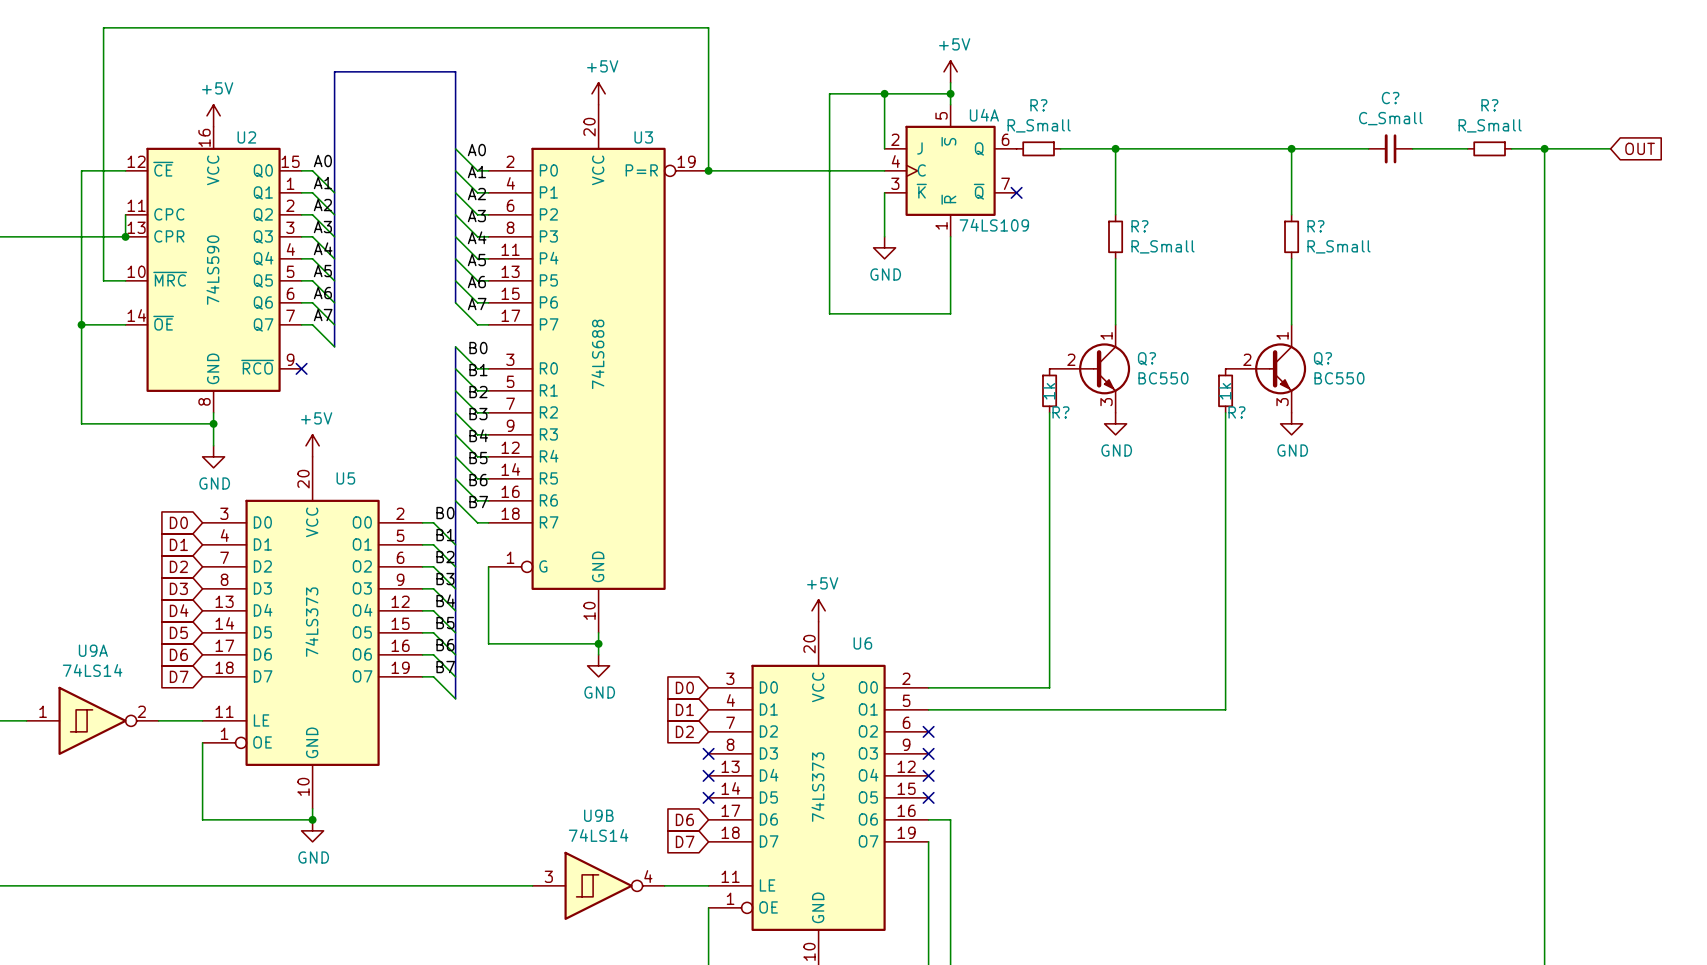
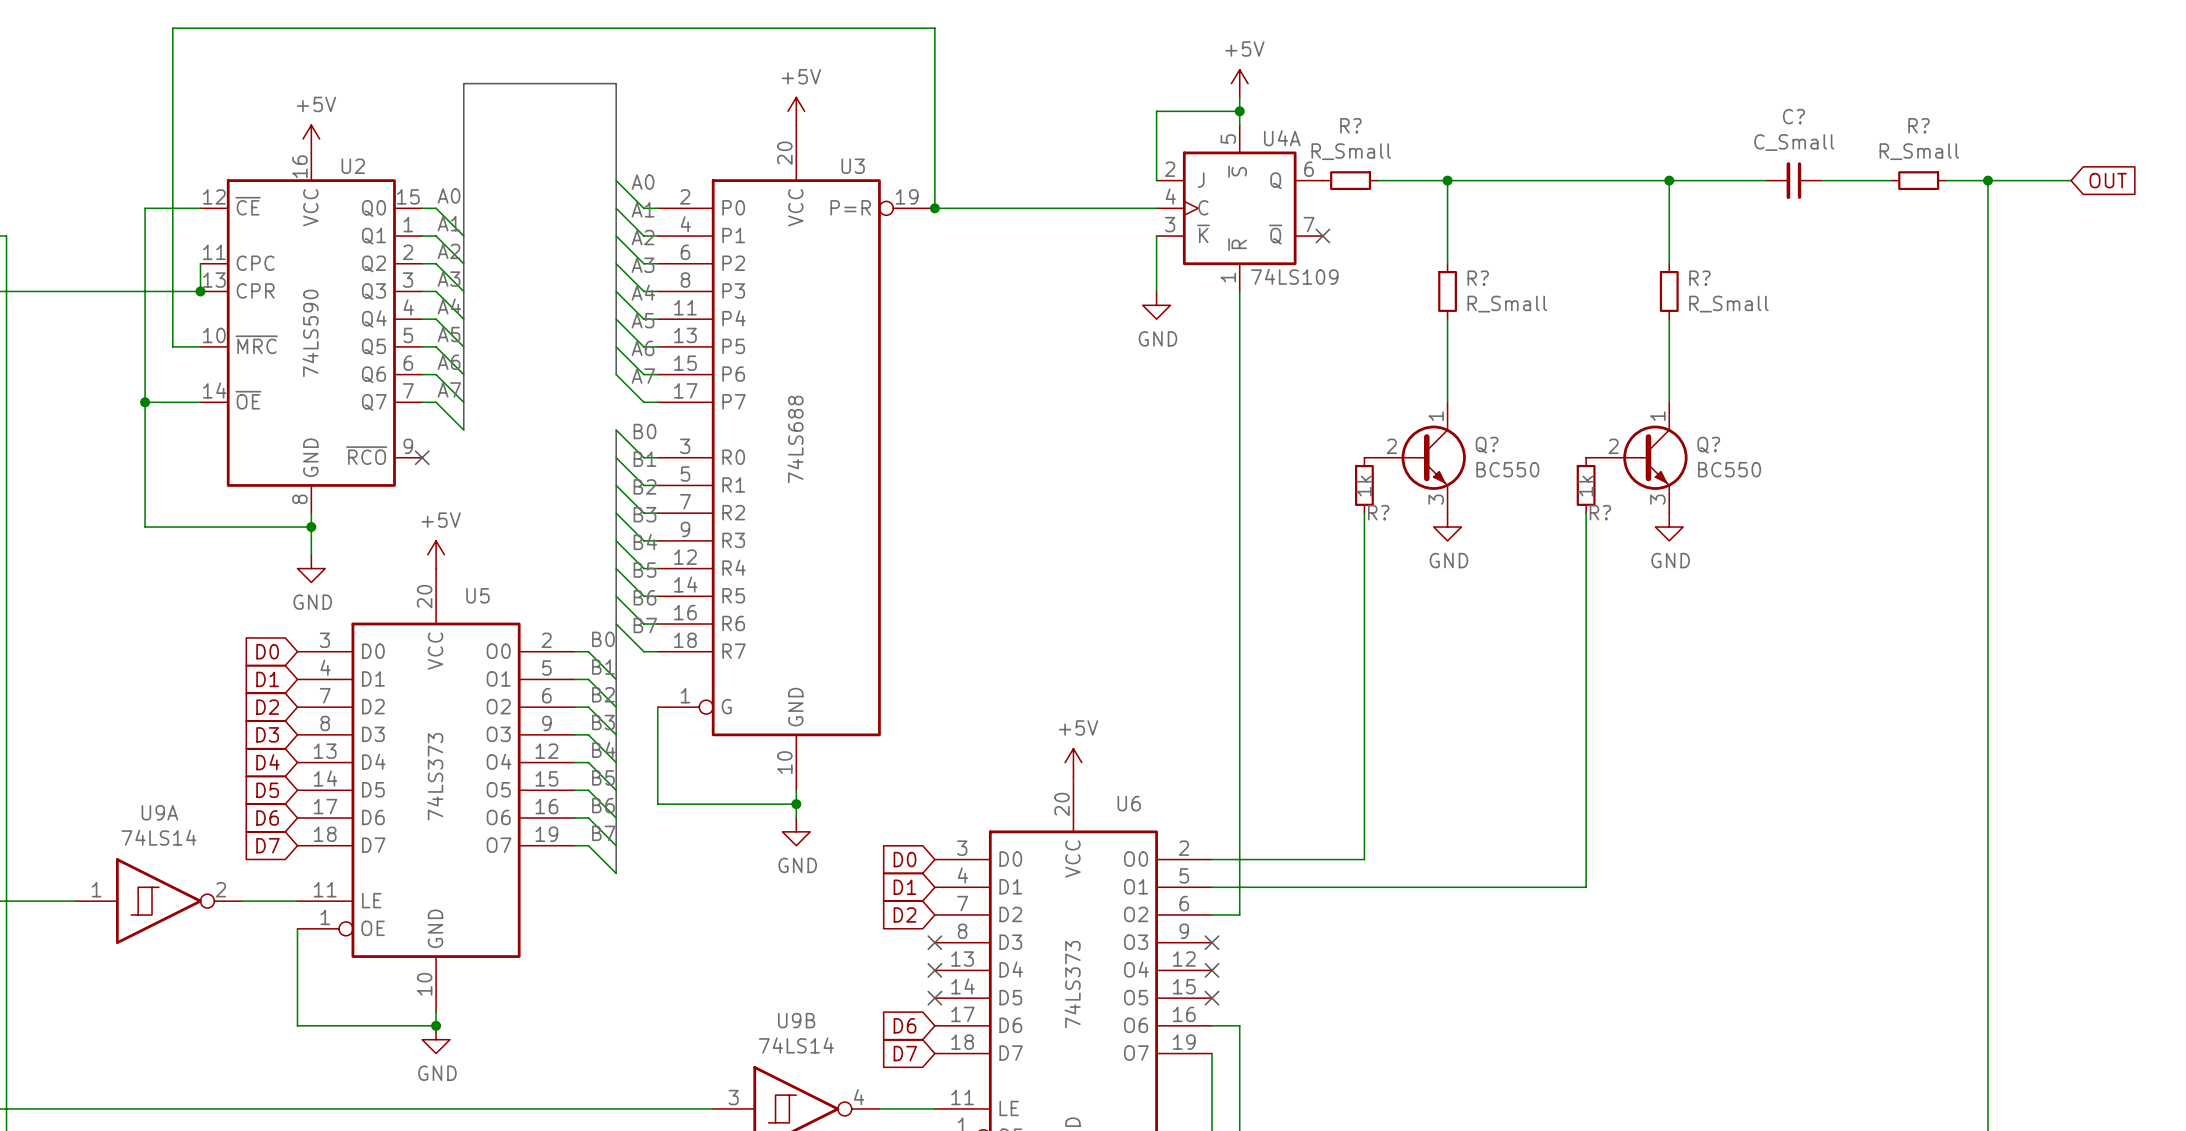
wire: (884, 93) (829, 93) (829, 313) (950, 313) -> (1212, 914) (1239, 914) (1239, 388)
junction: (884, 93) -> none
no-connect mark: (928, 731) -> none

